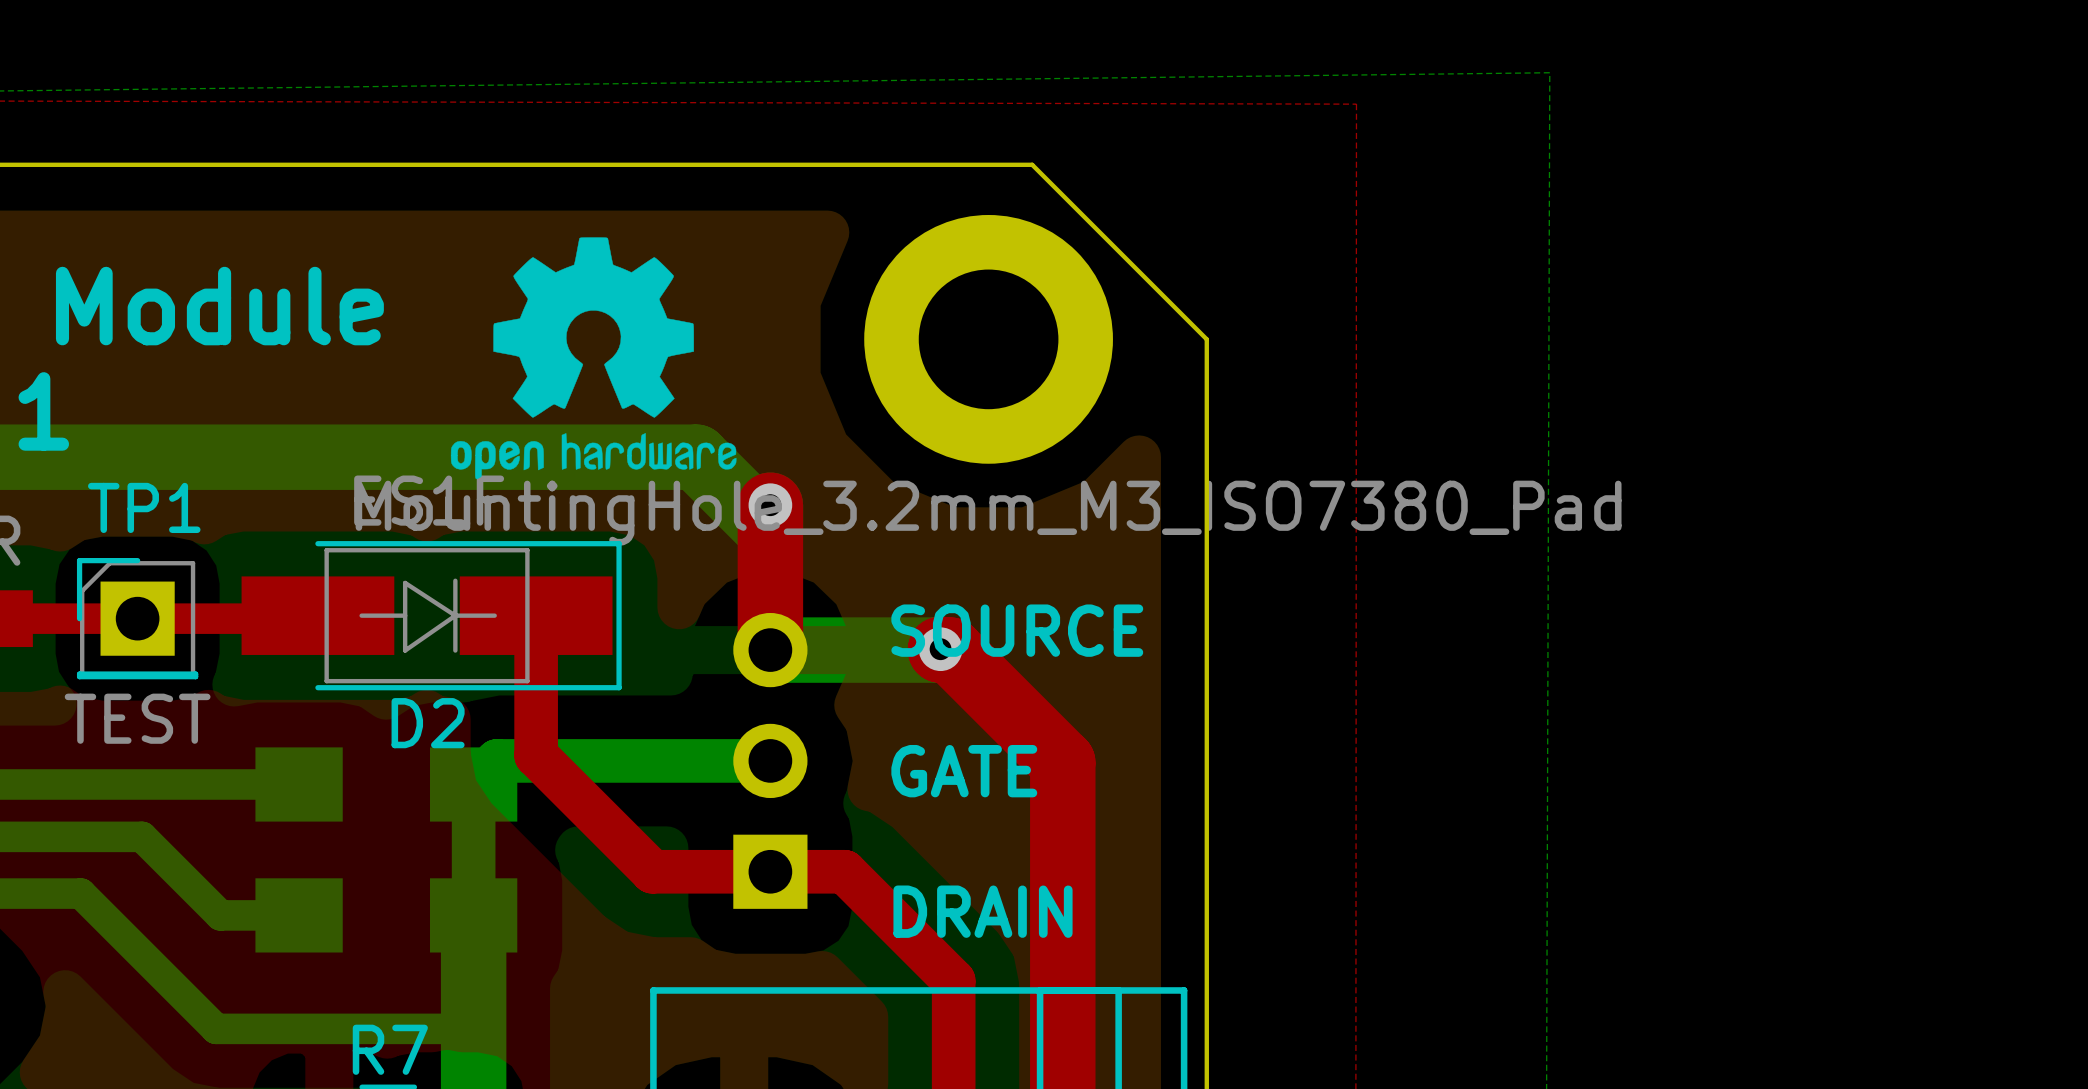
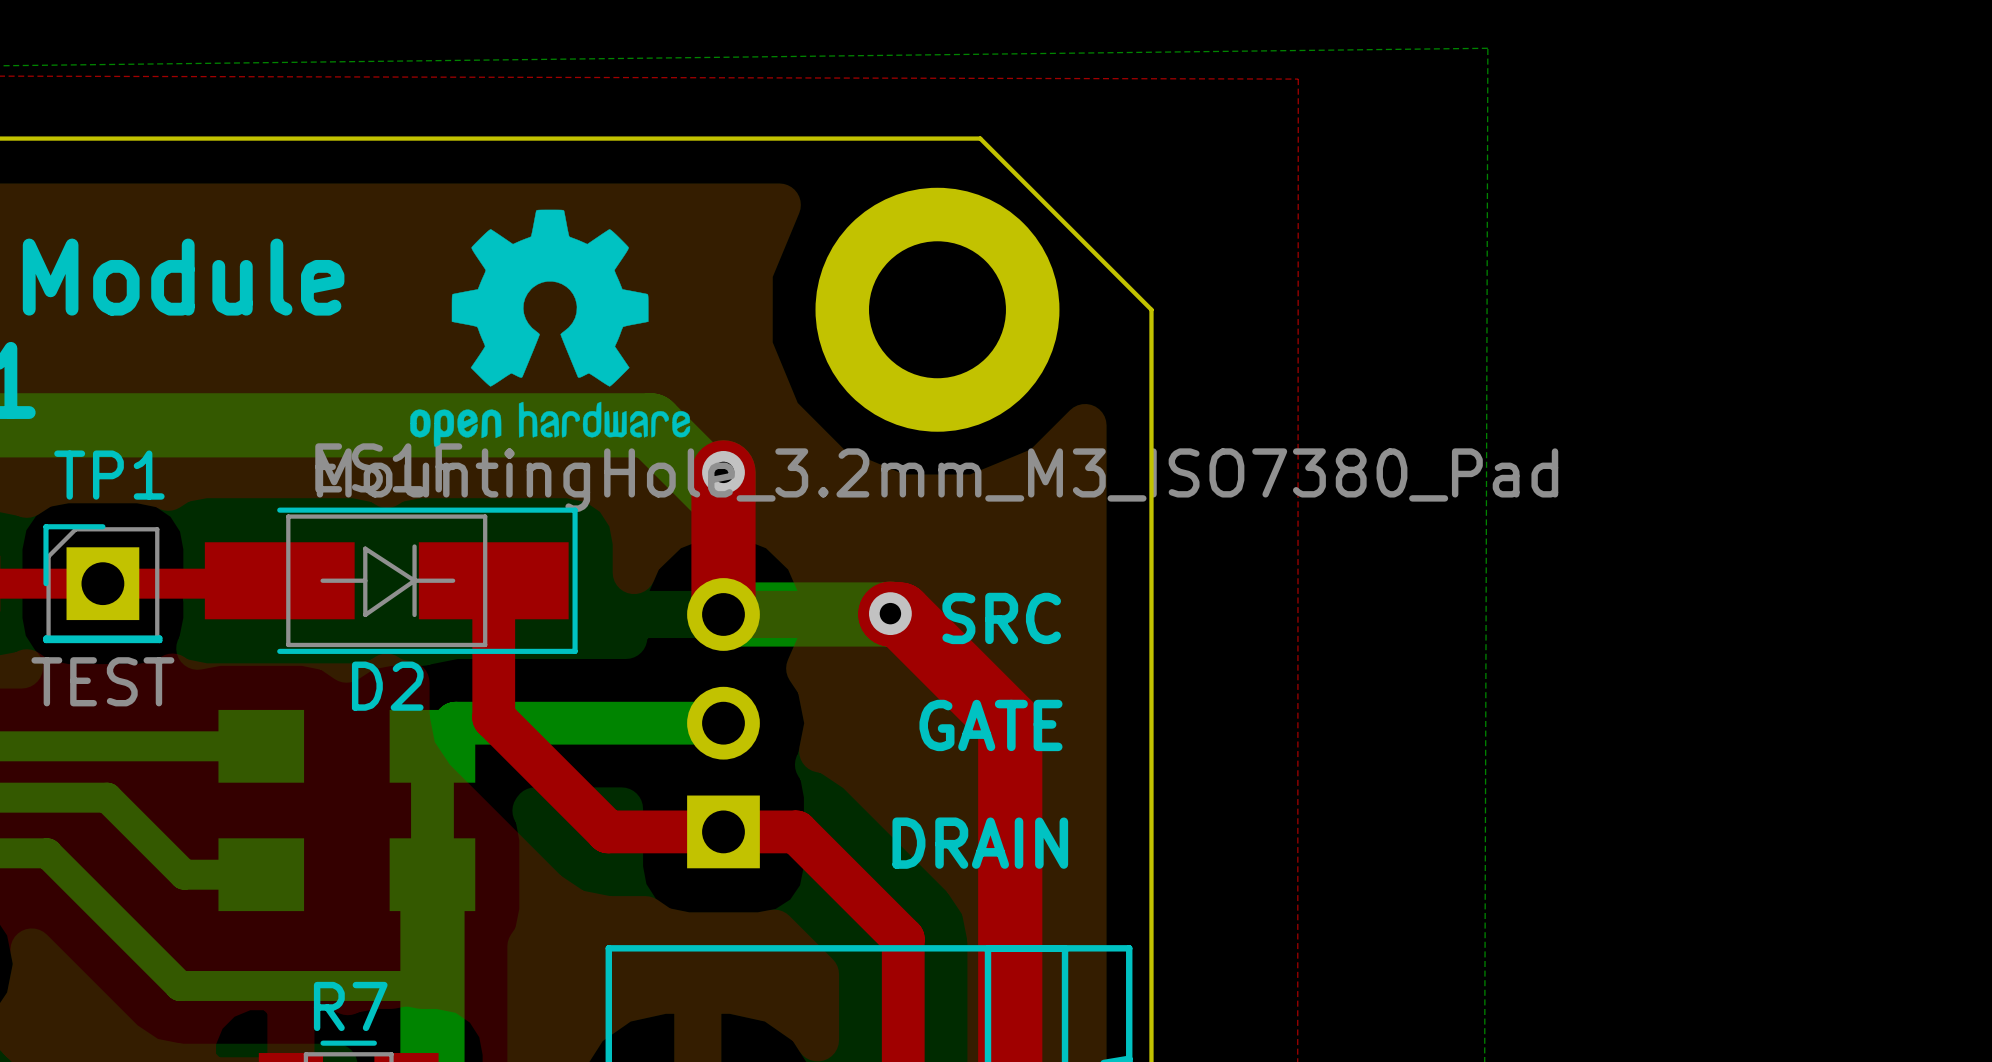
text: SOURCE (1017, 630) -> SRC (1001, 618)
text position: GATE (964, 771) -> GATE (990, 725)
text position: DRAIN (983, 911) -> DRAIN (980, 843)

